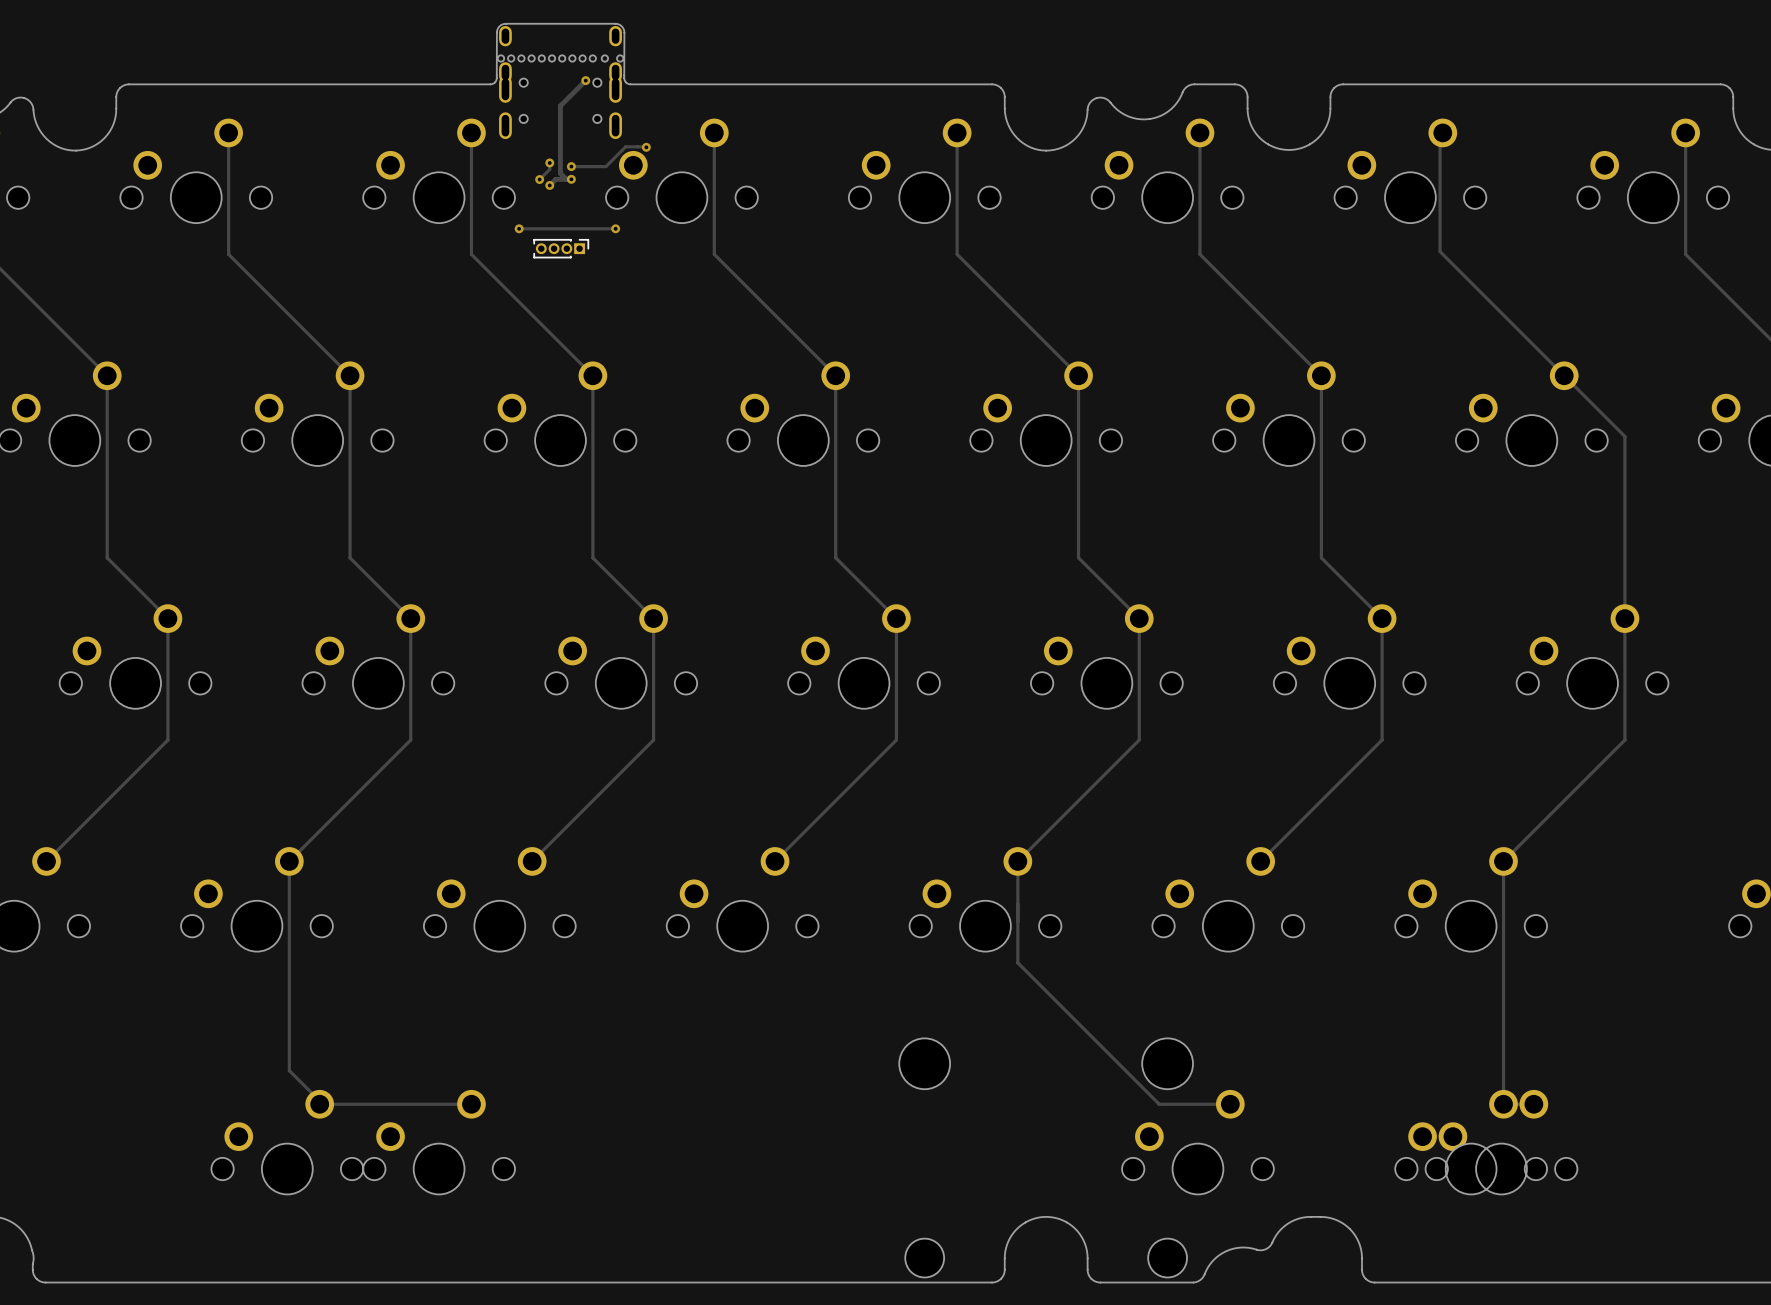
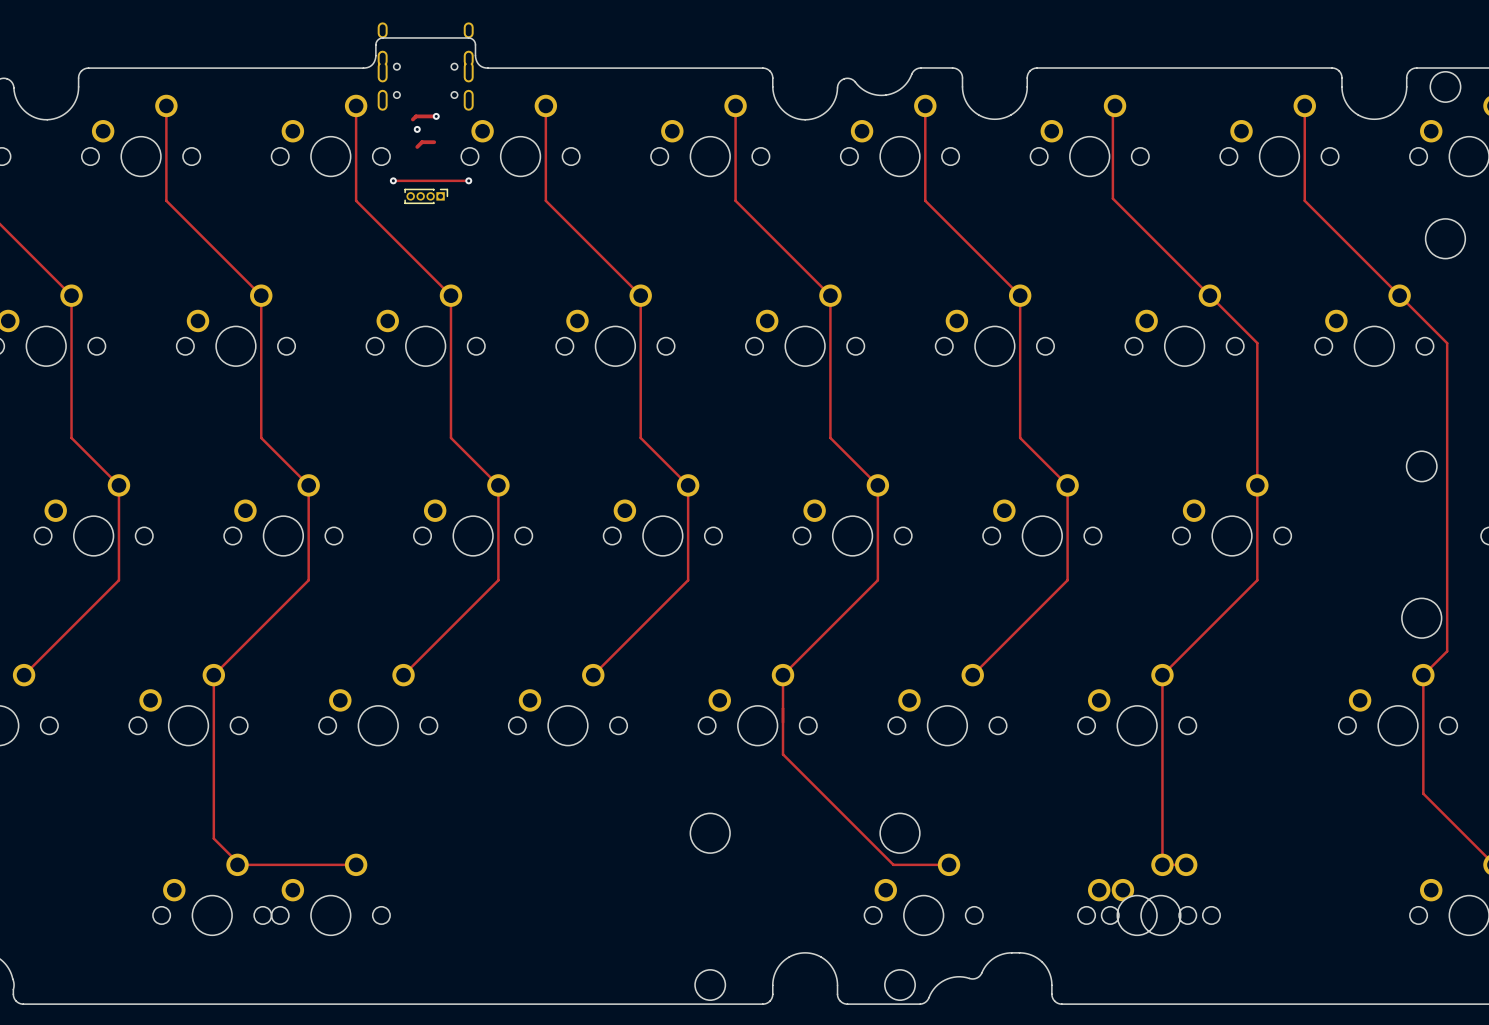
round board edge: [497, 55, 505, 62] -> none
round board edge: [508, 55, 515, 62] -> none
round board edge: [518, 55, 525, 62] -> none
round board edge: [528, 55, 535, 62] -> none
round board edge: [538, 55, 545, 62] -> none
round board edge: [548, 55, 556, 62] -> none
round board edge: [558, 55, 566, 62] -> none
round board edge: [569, 55, 576, 62] -> none
round board edge: [579, 55, 586, 62] -> none
round board edge: [589, 55, 596, 62] -> none
round board edge: [601, 55, 609, 62] -> none
round board edge: [616, 55, 624, 62] -> none
track: (585, 80) (560, 105) (560, 173) (566, 179) -> none
via: (585, 80) -> none
board edge: (116, 97) (120, 88) (128, 84) (491, 84) (496, 78) (497, 30) (500, 25) (505, 23) (619, 24) (624, 31) (624, 78) (629, 84) (992, 84) (1001, 88) (1004, 97) -> (78, 78) (81, 71) (88, 68) (365, 67) (373, 63) (376, 42) (382, 37) (470, 38) (475, 42) (477, 61) (485, 67) (763, 68) (770, 71) (772, 78)
track: none -> (436, 116) (415, 116) (412, 119)
via: none -> (436, 116)
track: (646, 147) (625, 146) (605, 166) (571, 166) -> none
via: (646, 147) -> none
track: (549, 162) (549, 169) (539, 179) -> none
via: (571, 166) -> none
via: (539, 179) -> none
via: (571, 179) -> none
via: (549, 185) -> none

